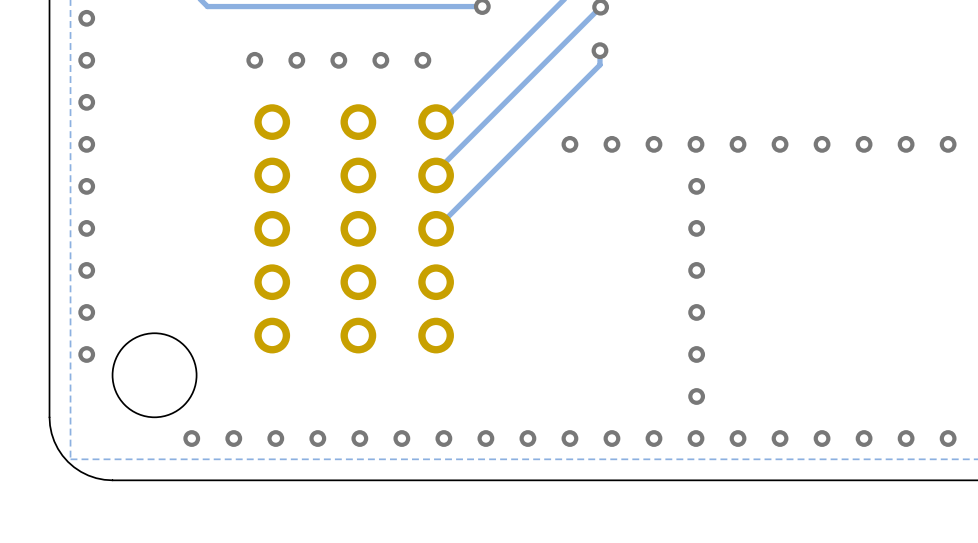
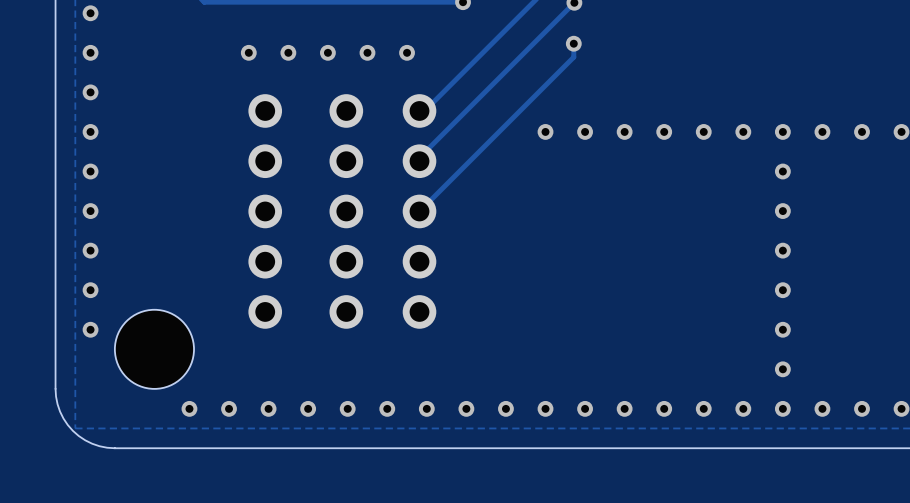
via: (696, 186) -> none
via: none -> (782, 171)
via: (696, 228) -> none
via: none -> (782, 211)
via: (696, 270) -> none
via: none -> (782, 250)
via: (696, 312) -> none
via: none -> (782, 290)
via: (696, 354) -> none
via: none -> (782, 329)
via: (696, 396) -> none
via: none -> (782, 369)

